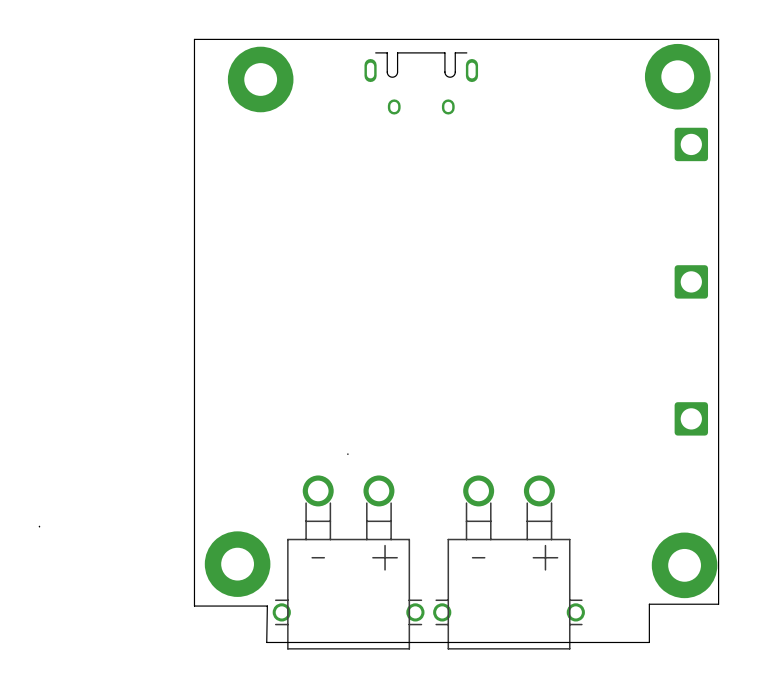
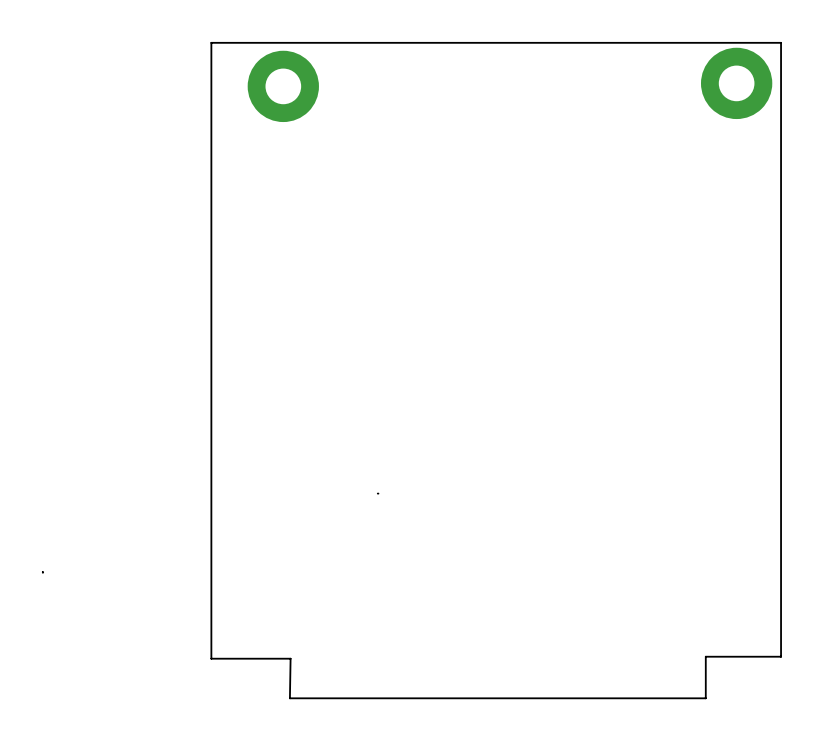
part: (421, 83) -> none
part: (691, 144) -> none
part: (691, 281) -> none
part: (691, 418) -> none
part: (348, 562) -> none
part: (509, 562) -> none
part: (237, 564) -> none
part: (684, 565) -> none

